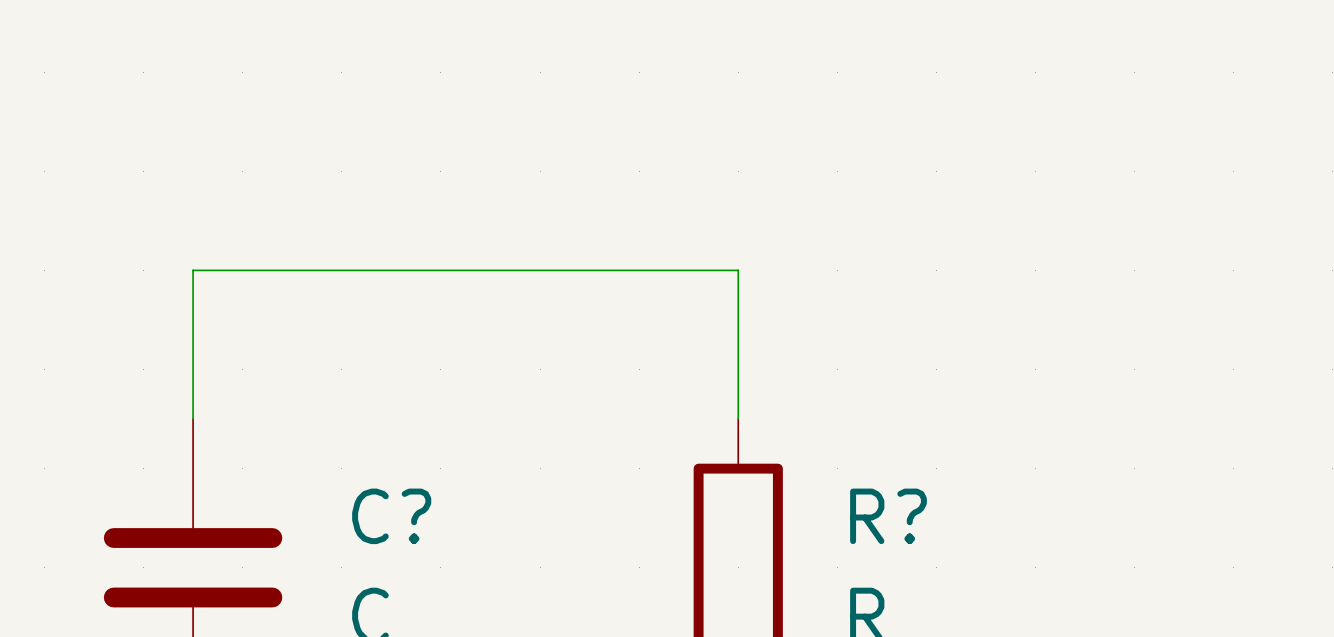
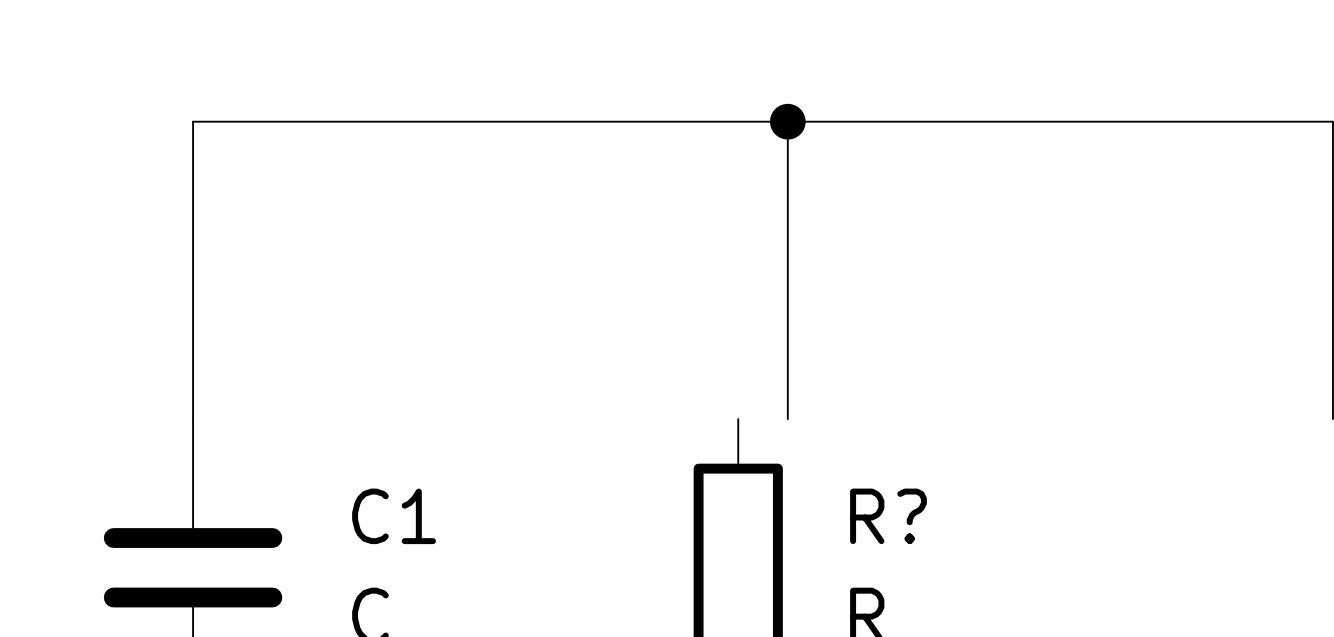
wire: none -> (787, 121) (787, 419)
junction: none -> (787, 121)
wire: (193, 270) (738, 270) (738, 419) -> (193, 270) (193, 121) (1332, 121) (1332, 419)
C? name: C? (391, 516) -> C1 (394, 516)

